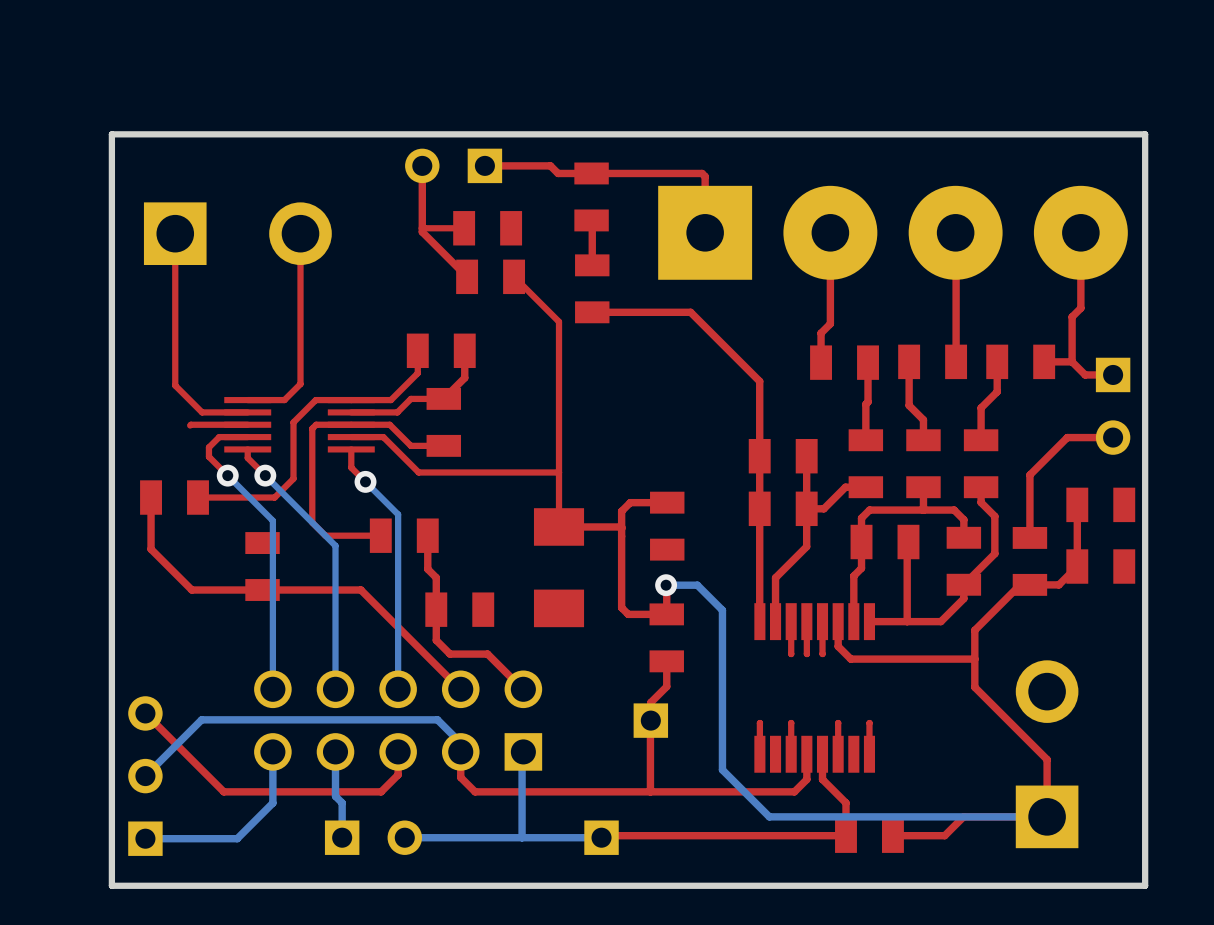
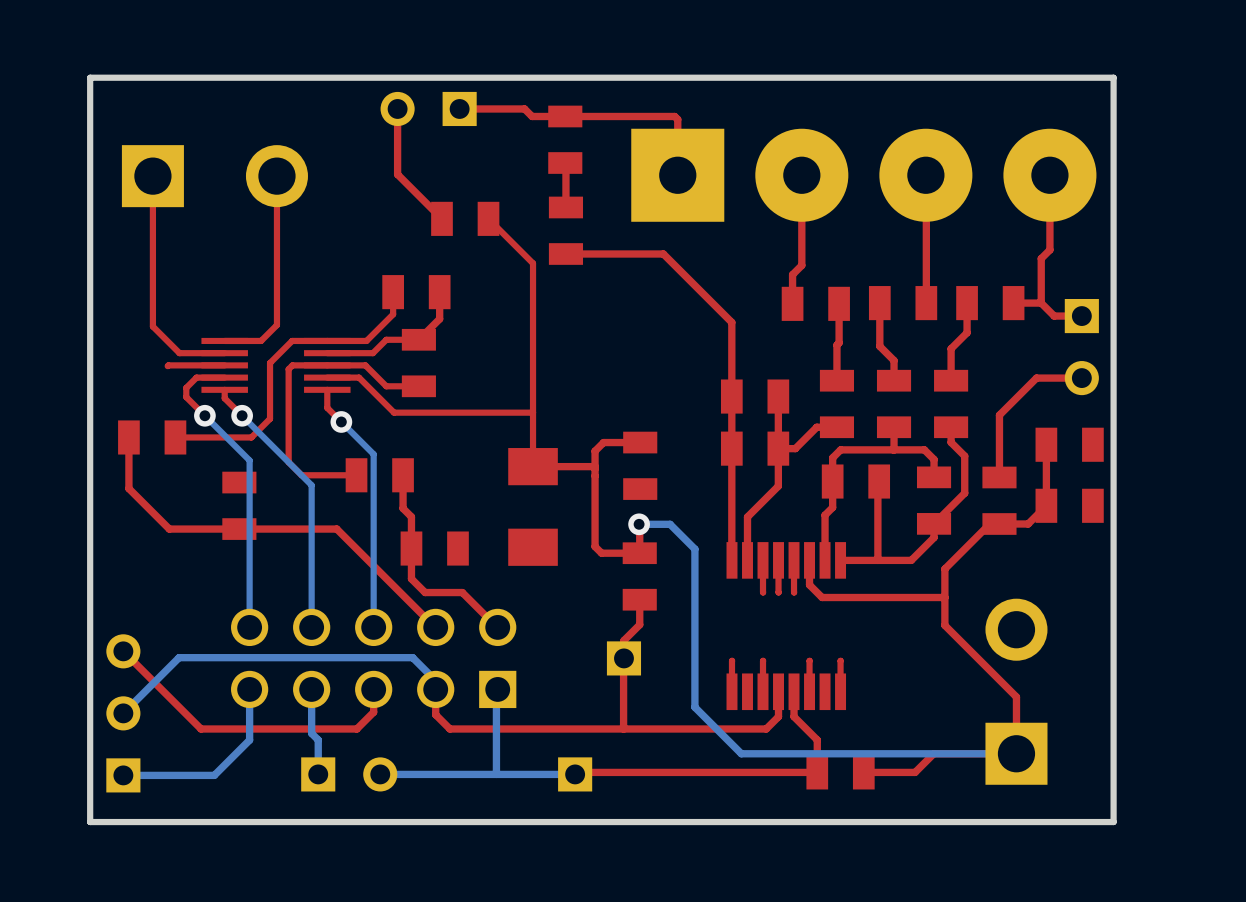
top track: (464, 228) (422, 228) -> none
part: (487, 228) -> none

